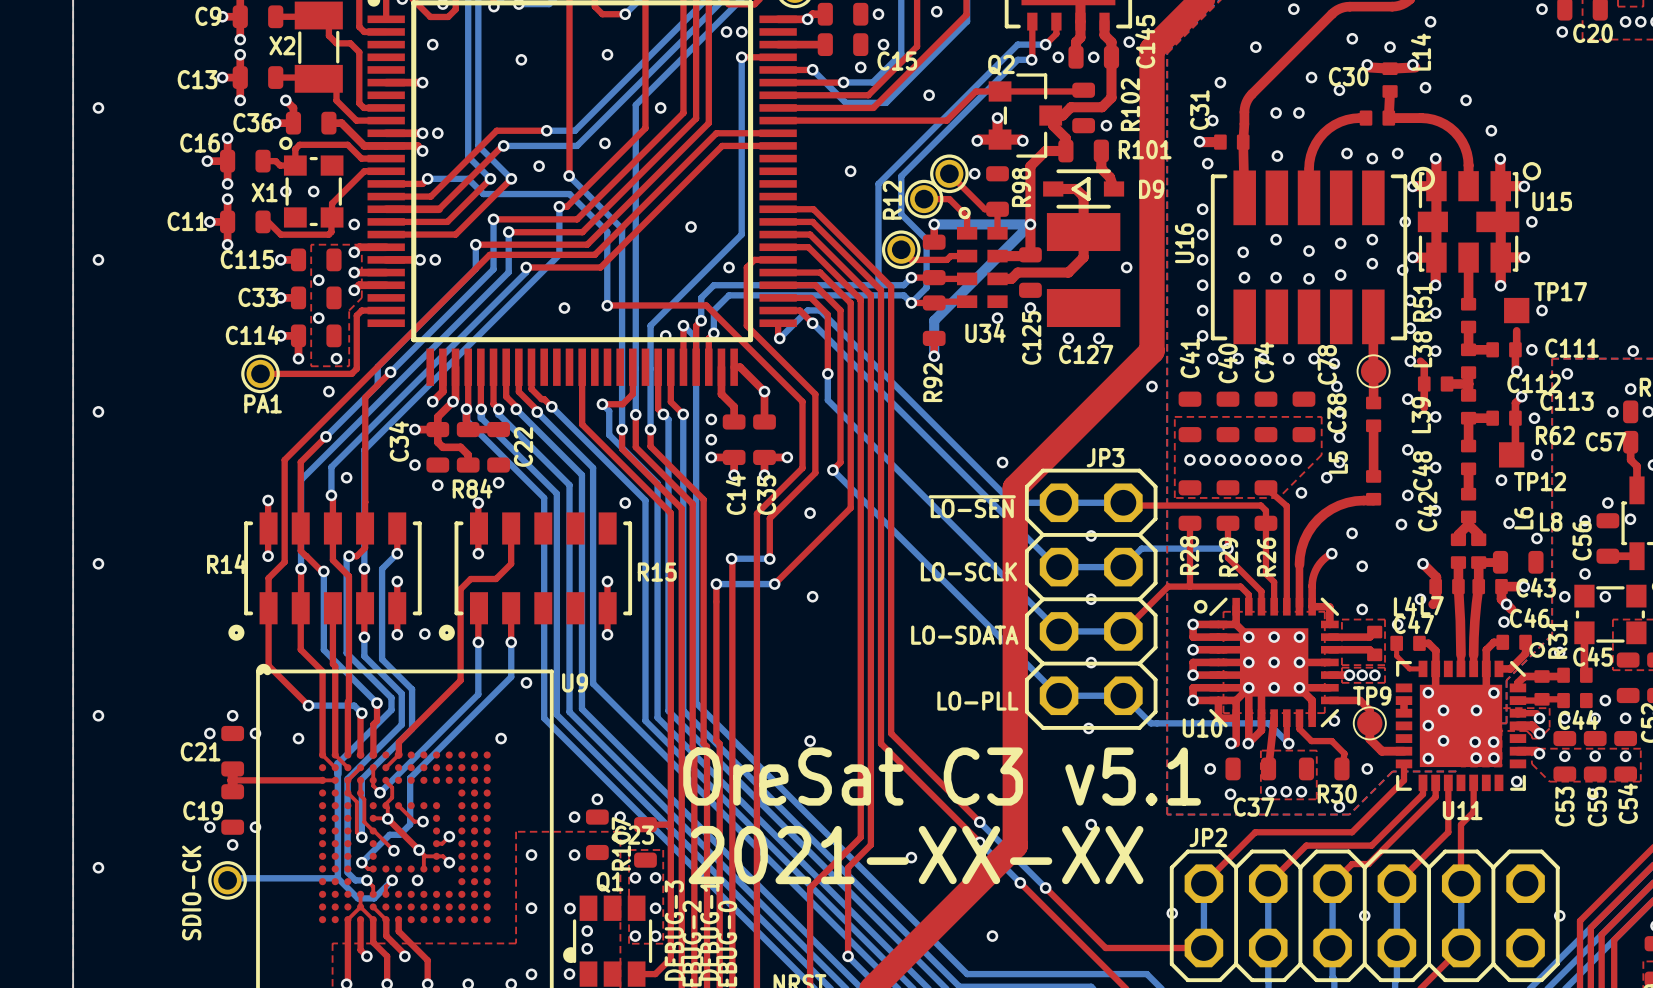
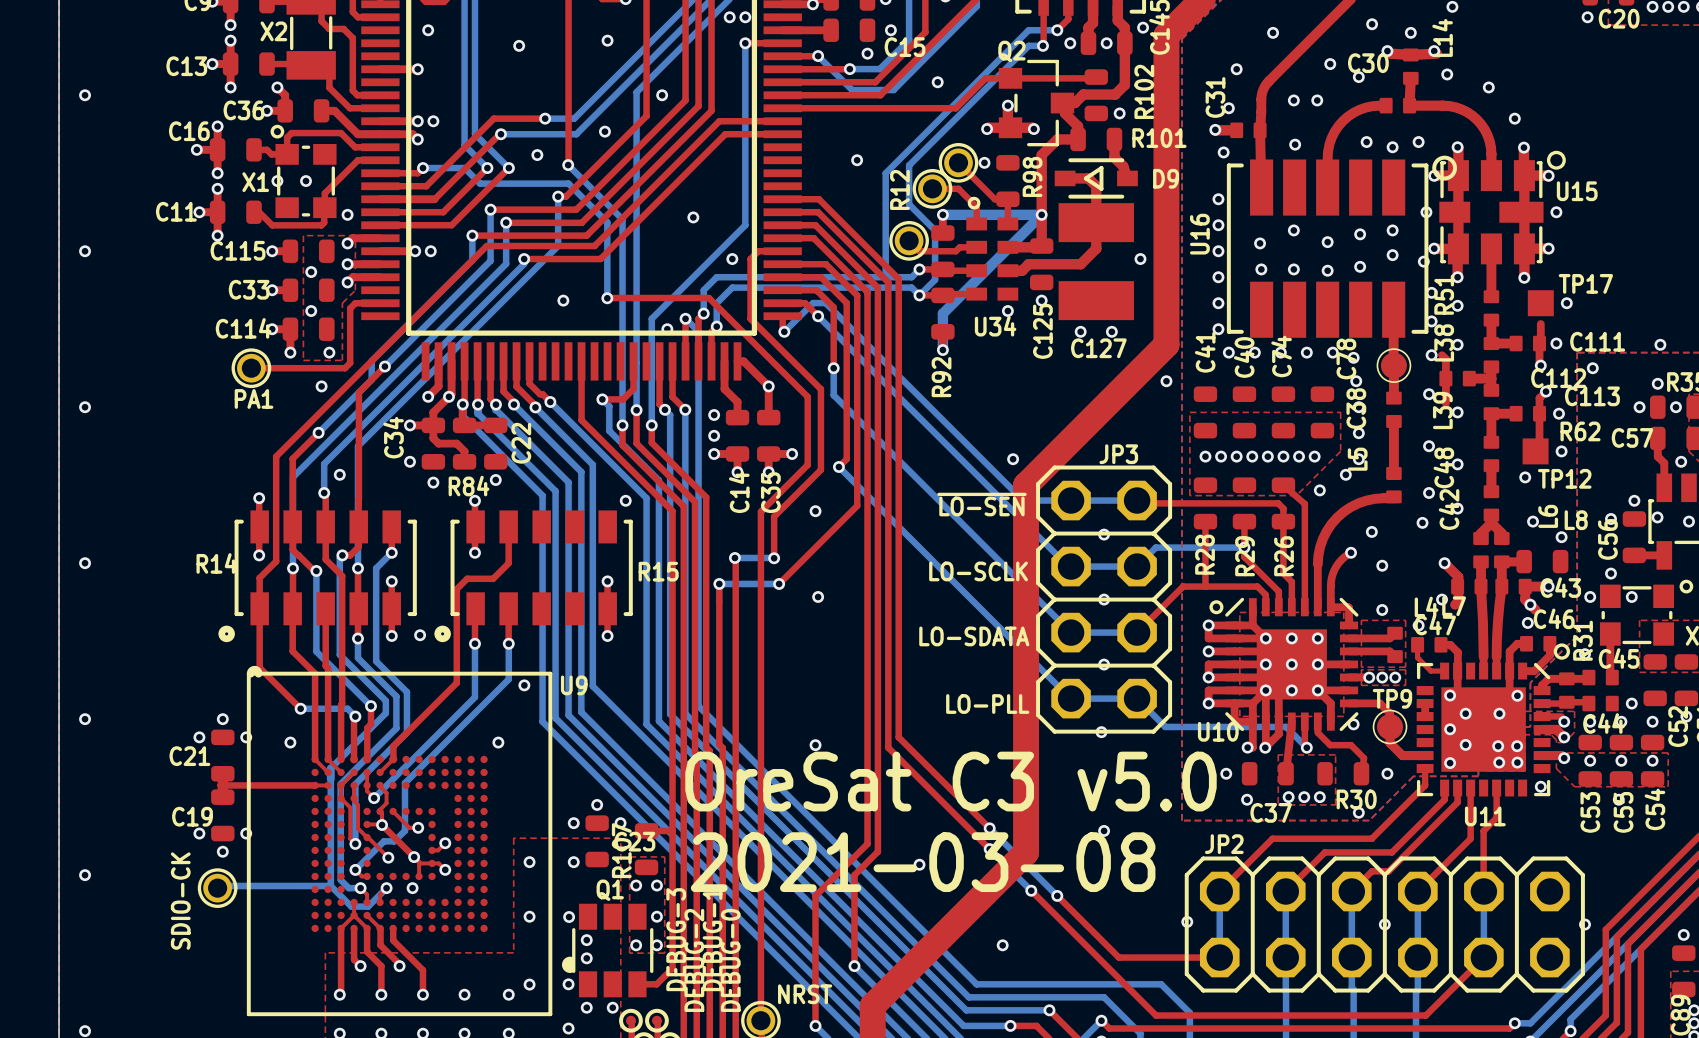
text: OreSat C3 v5.1 (942, 776) -> OreSat C3 v5.0 (951, 781)
text: 2021-XX-XX (916, 855) -> 2021-03-08 (923, 862)

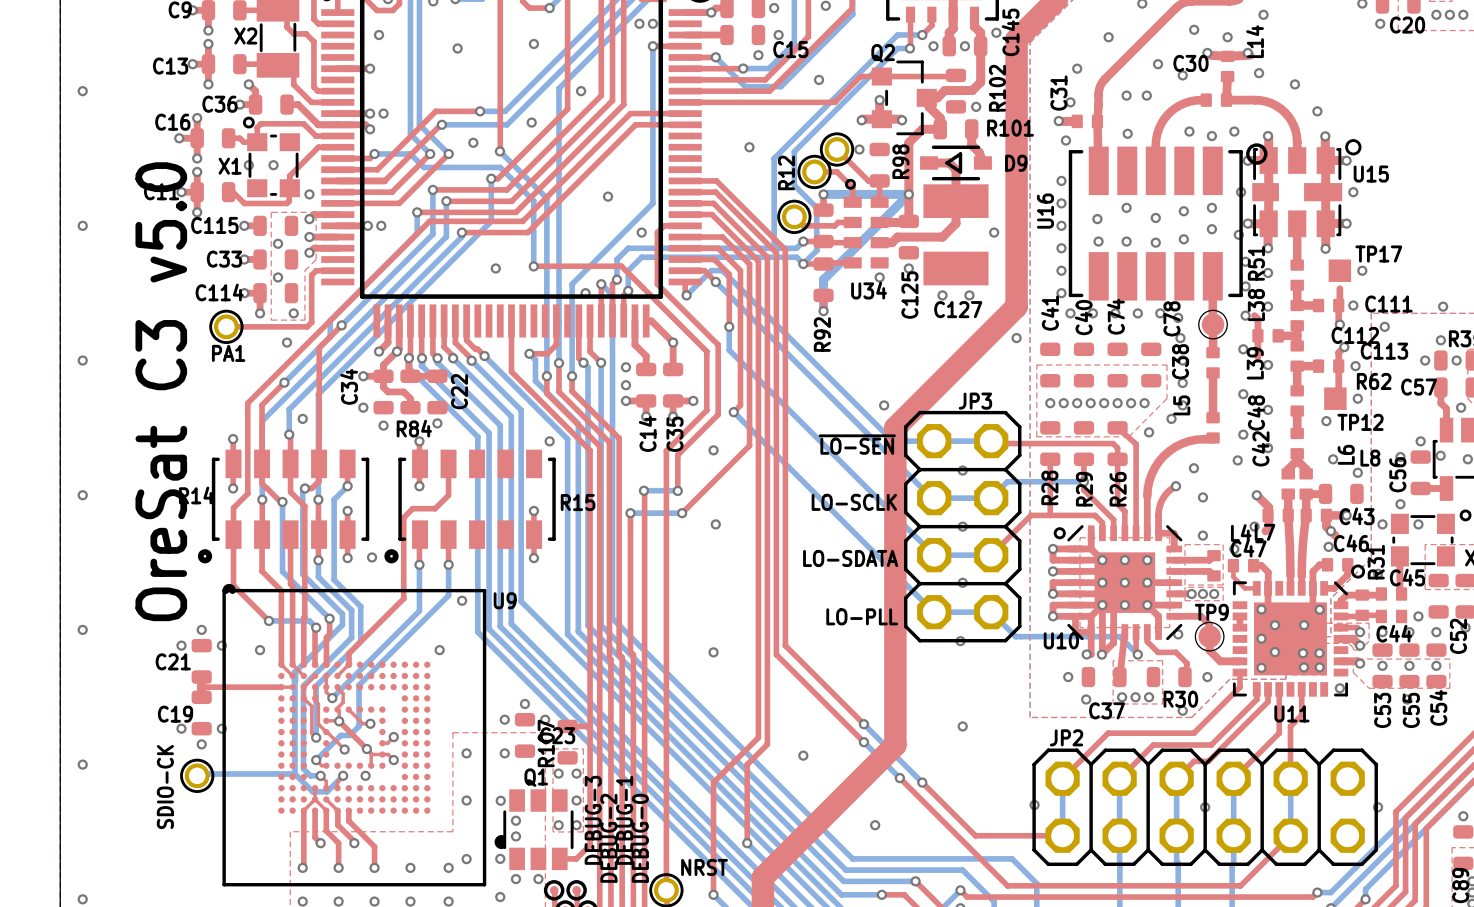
text rotation: 0° (951, 781) -> 90° counterclockwise (161, 391)
text position: OreSat C3 v5.0 (951, 781) -> OreSat C3 v5.0 (161, 391)
text: 2021-03-08 (923, 862) -> none

